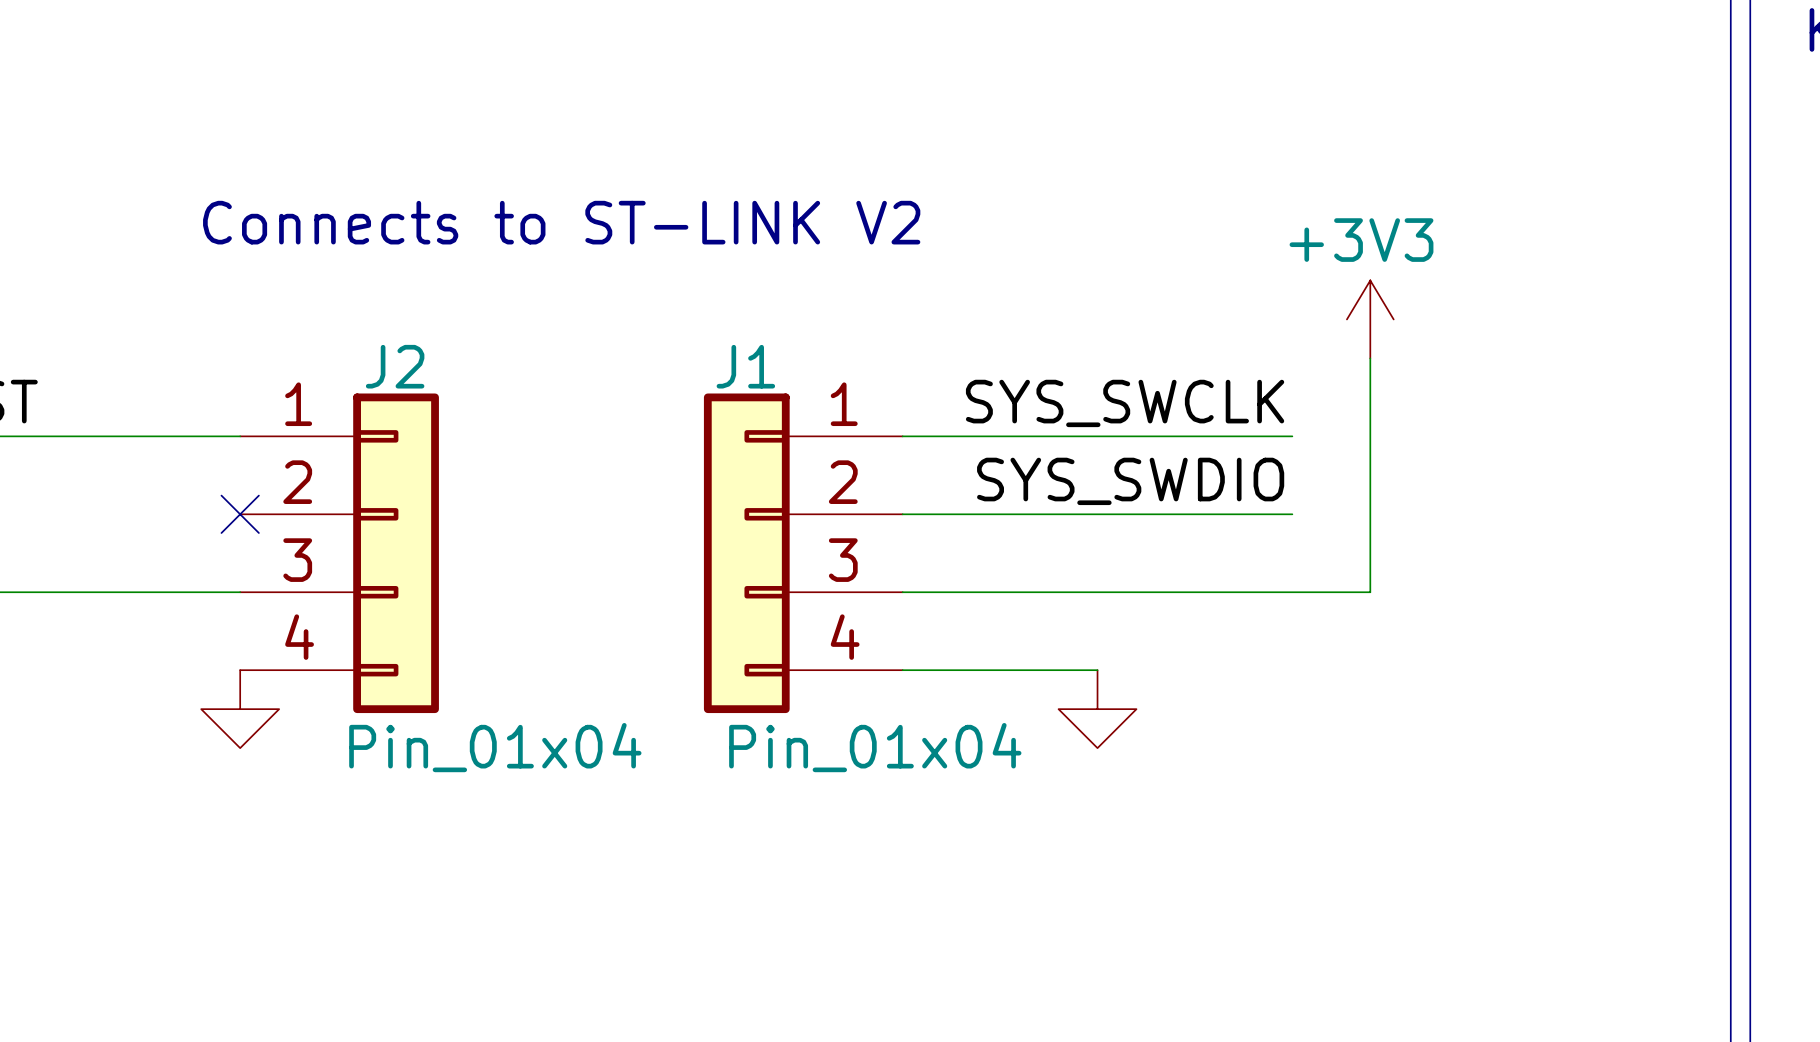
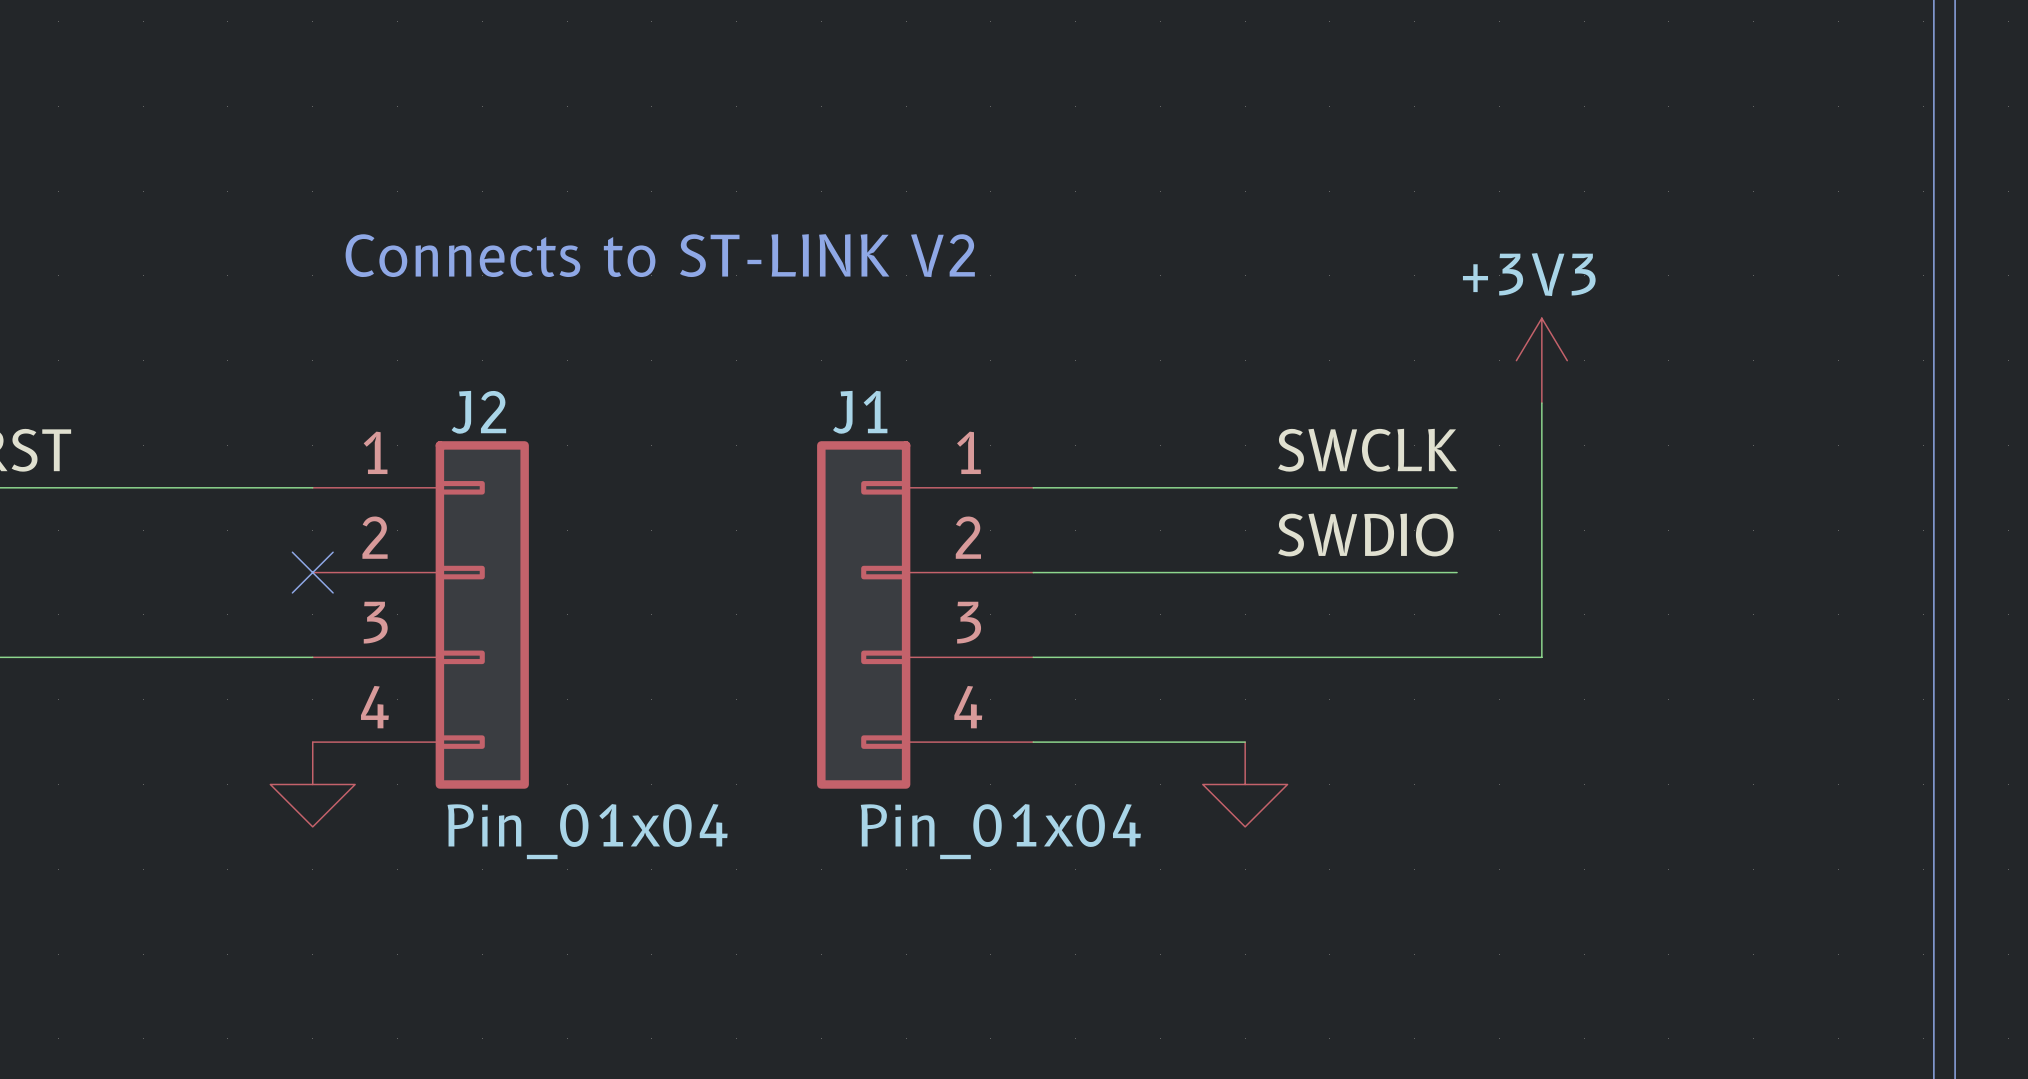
label: SYS_SWCLK (1125, 403) -> SWCLK (1367, 450)
label: SYS_SWDIO (1130, 481) -> SWDIO (1365, 534)

